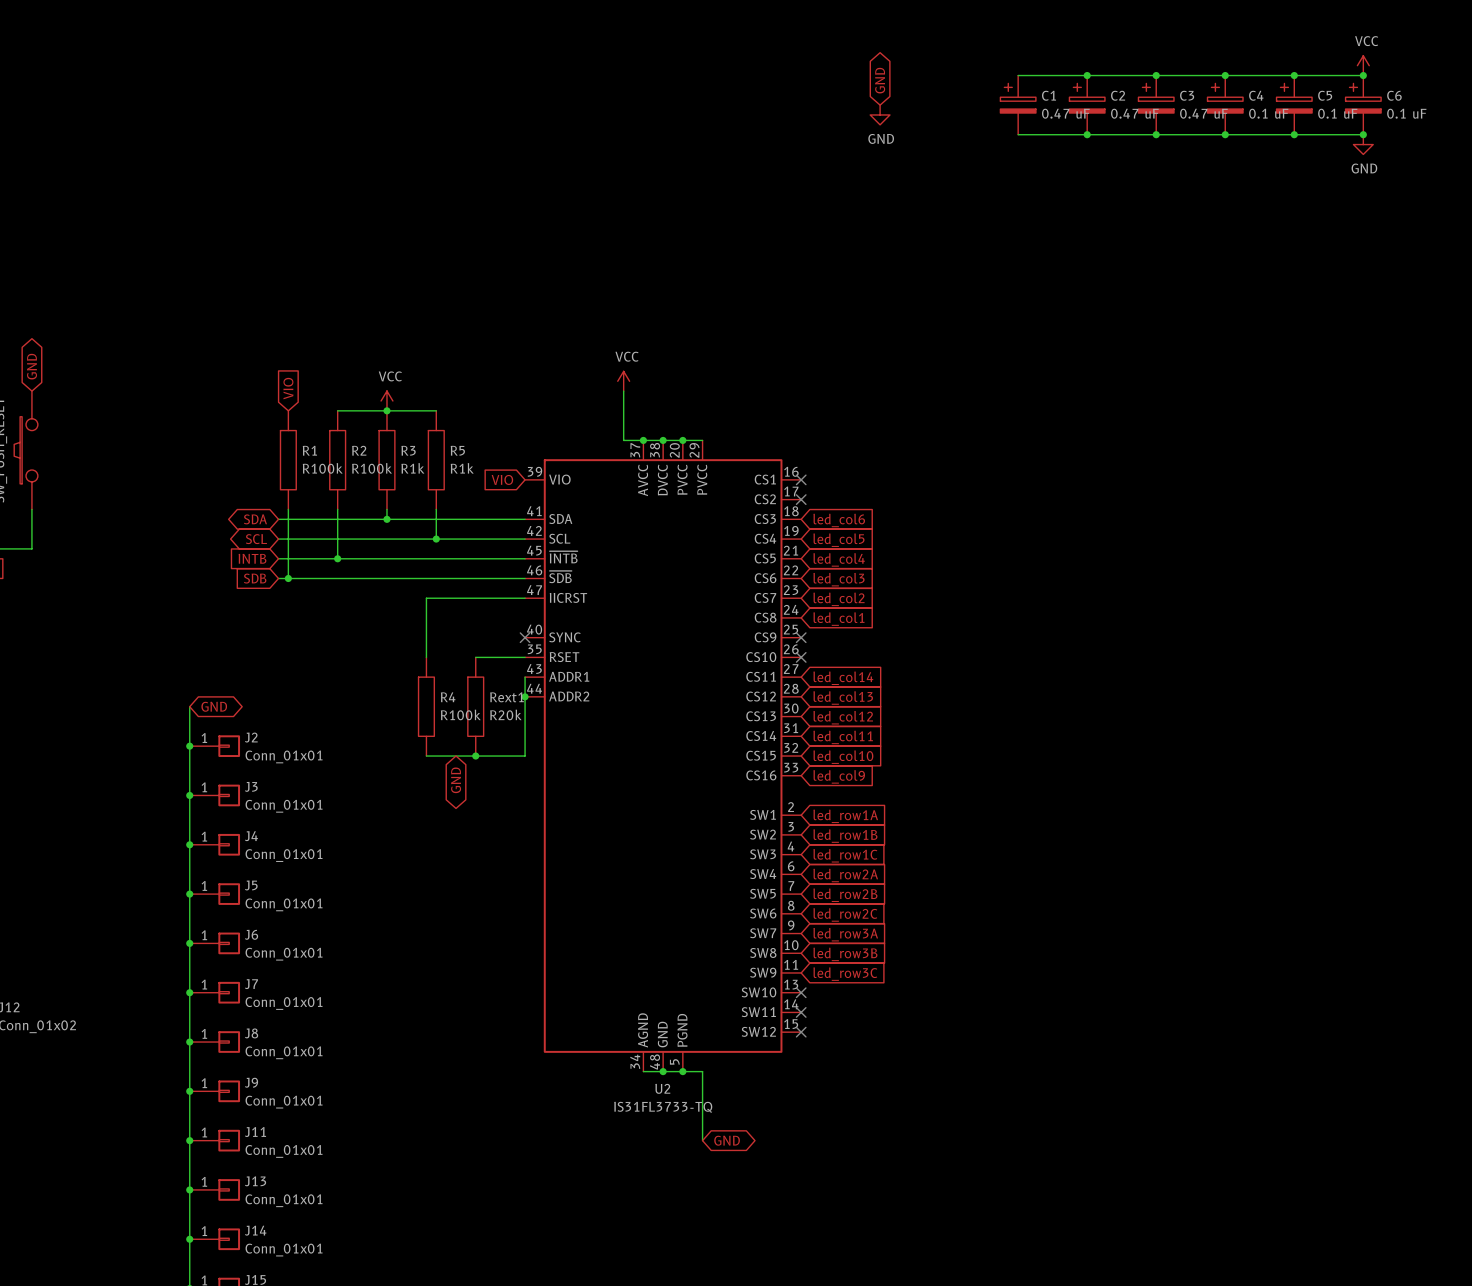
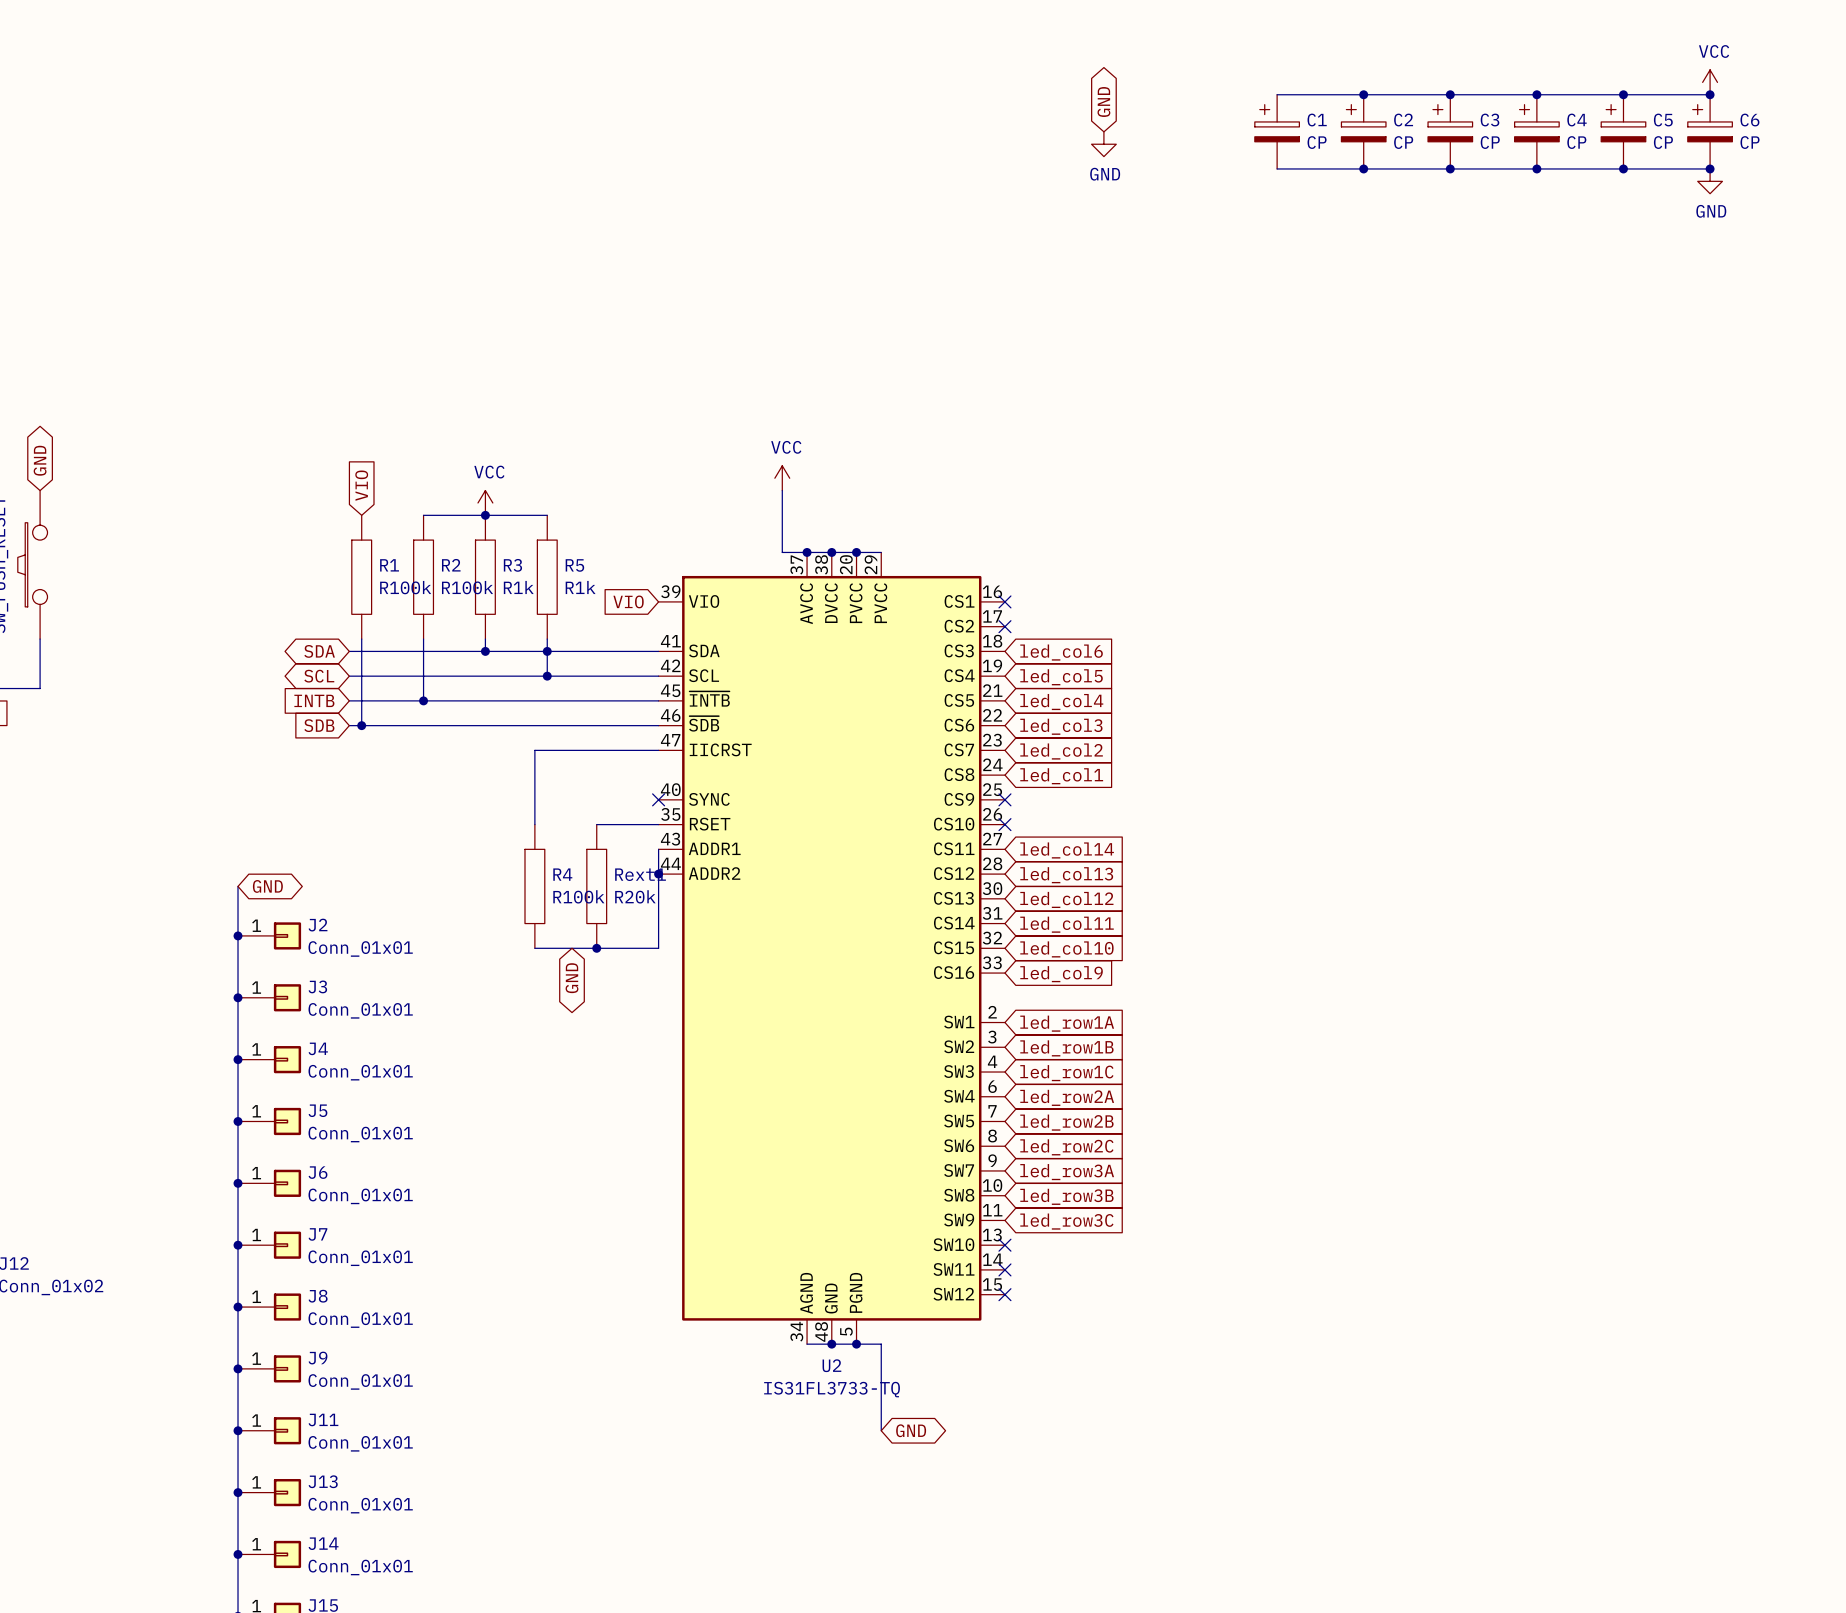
C1 value: 0.47 uF (1065, 113) -> CP (1317, 142)
C2 value: 0.47 uF (1134, 113) -> CP (1403, 142)
C3 value: 0.47 uF (1203, 113) -> CP (1490, 142)
C4 value: 0.1 uF (1268, 113) -> CP (1576, 142)
C5 value: 0.1 uF (1337, 113) -> CP (1663, 142)
C6 value: 0.1 uF (1406, 113) -> CP (1750, 142)
junction: none -> (547, 651)

